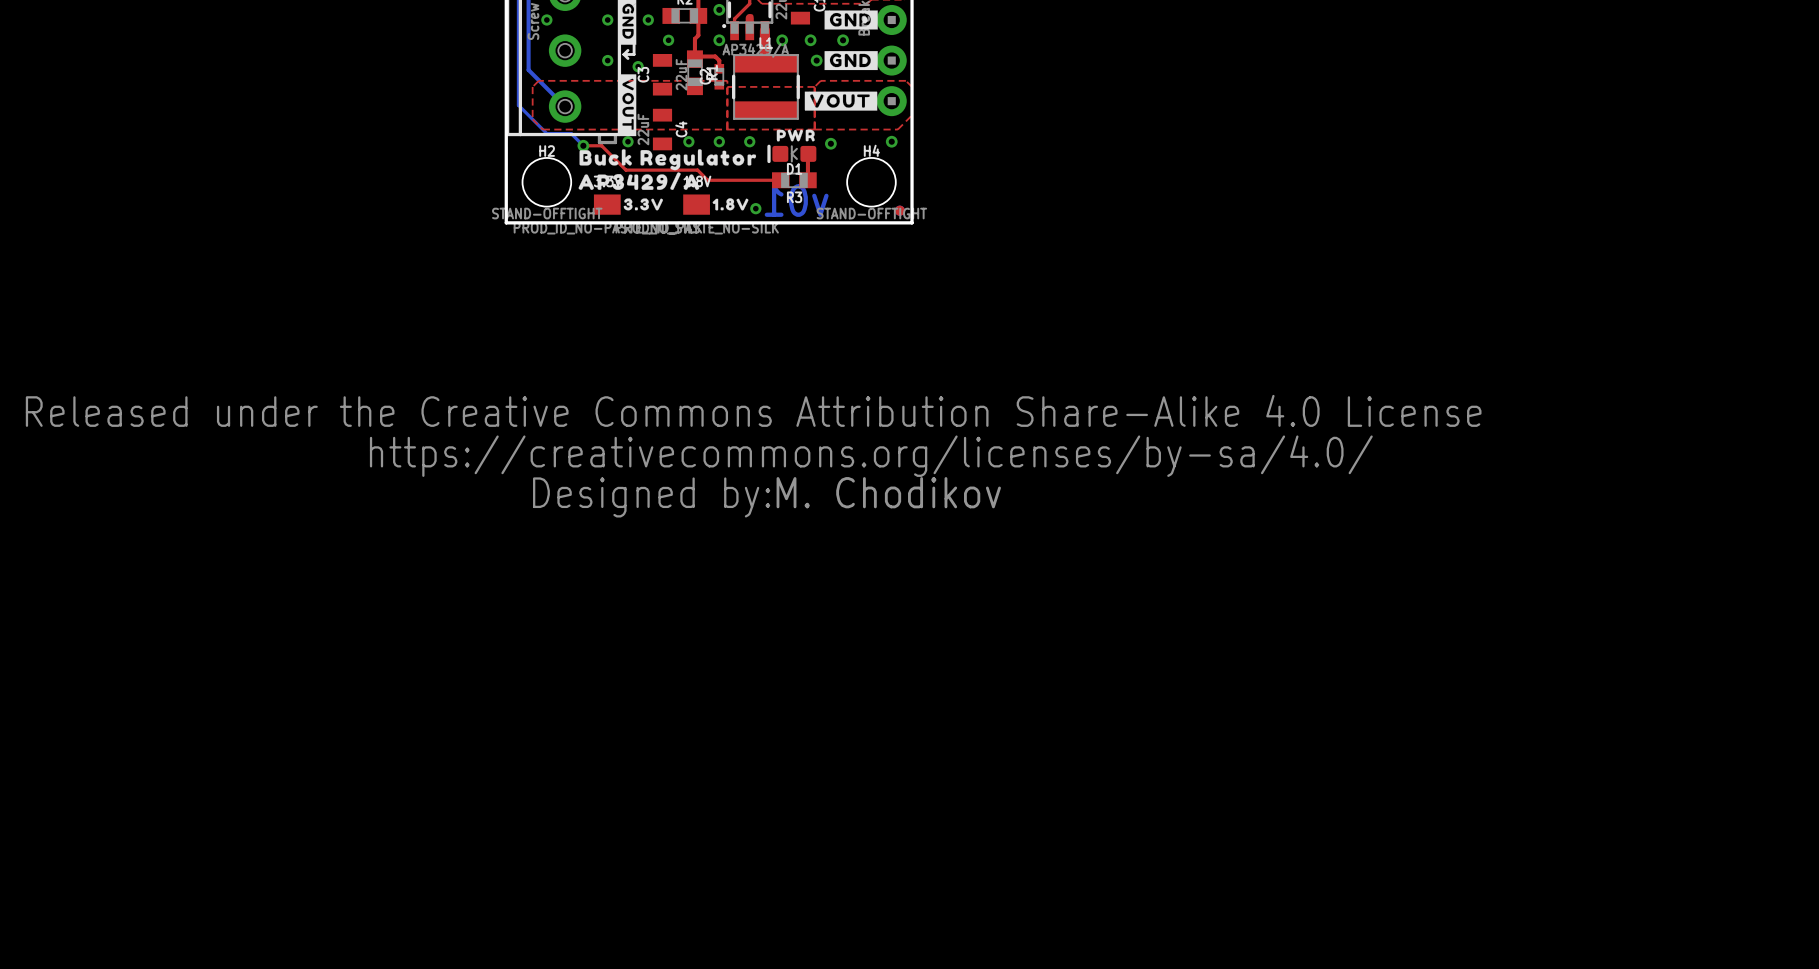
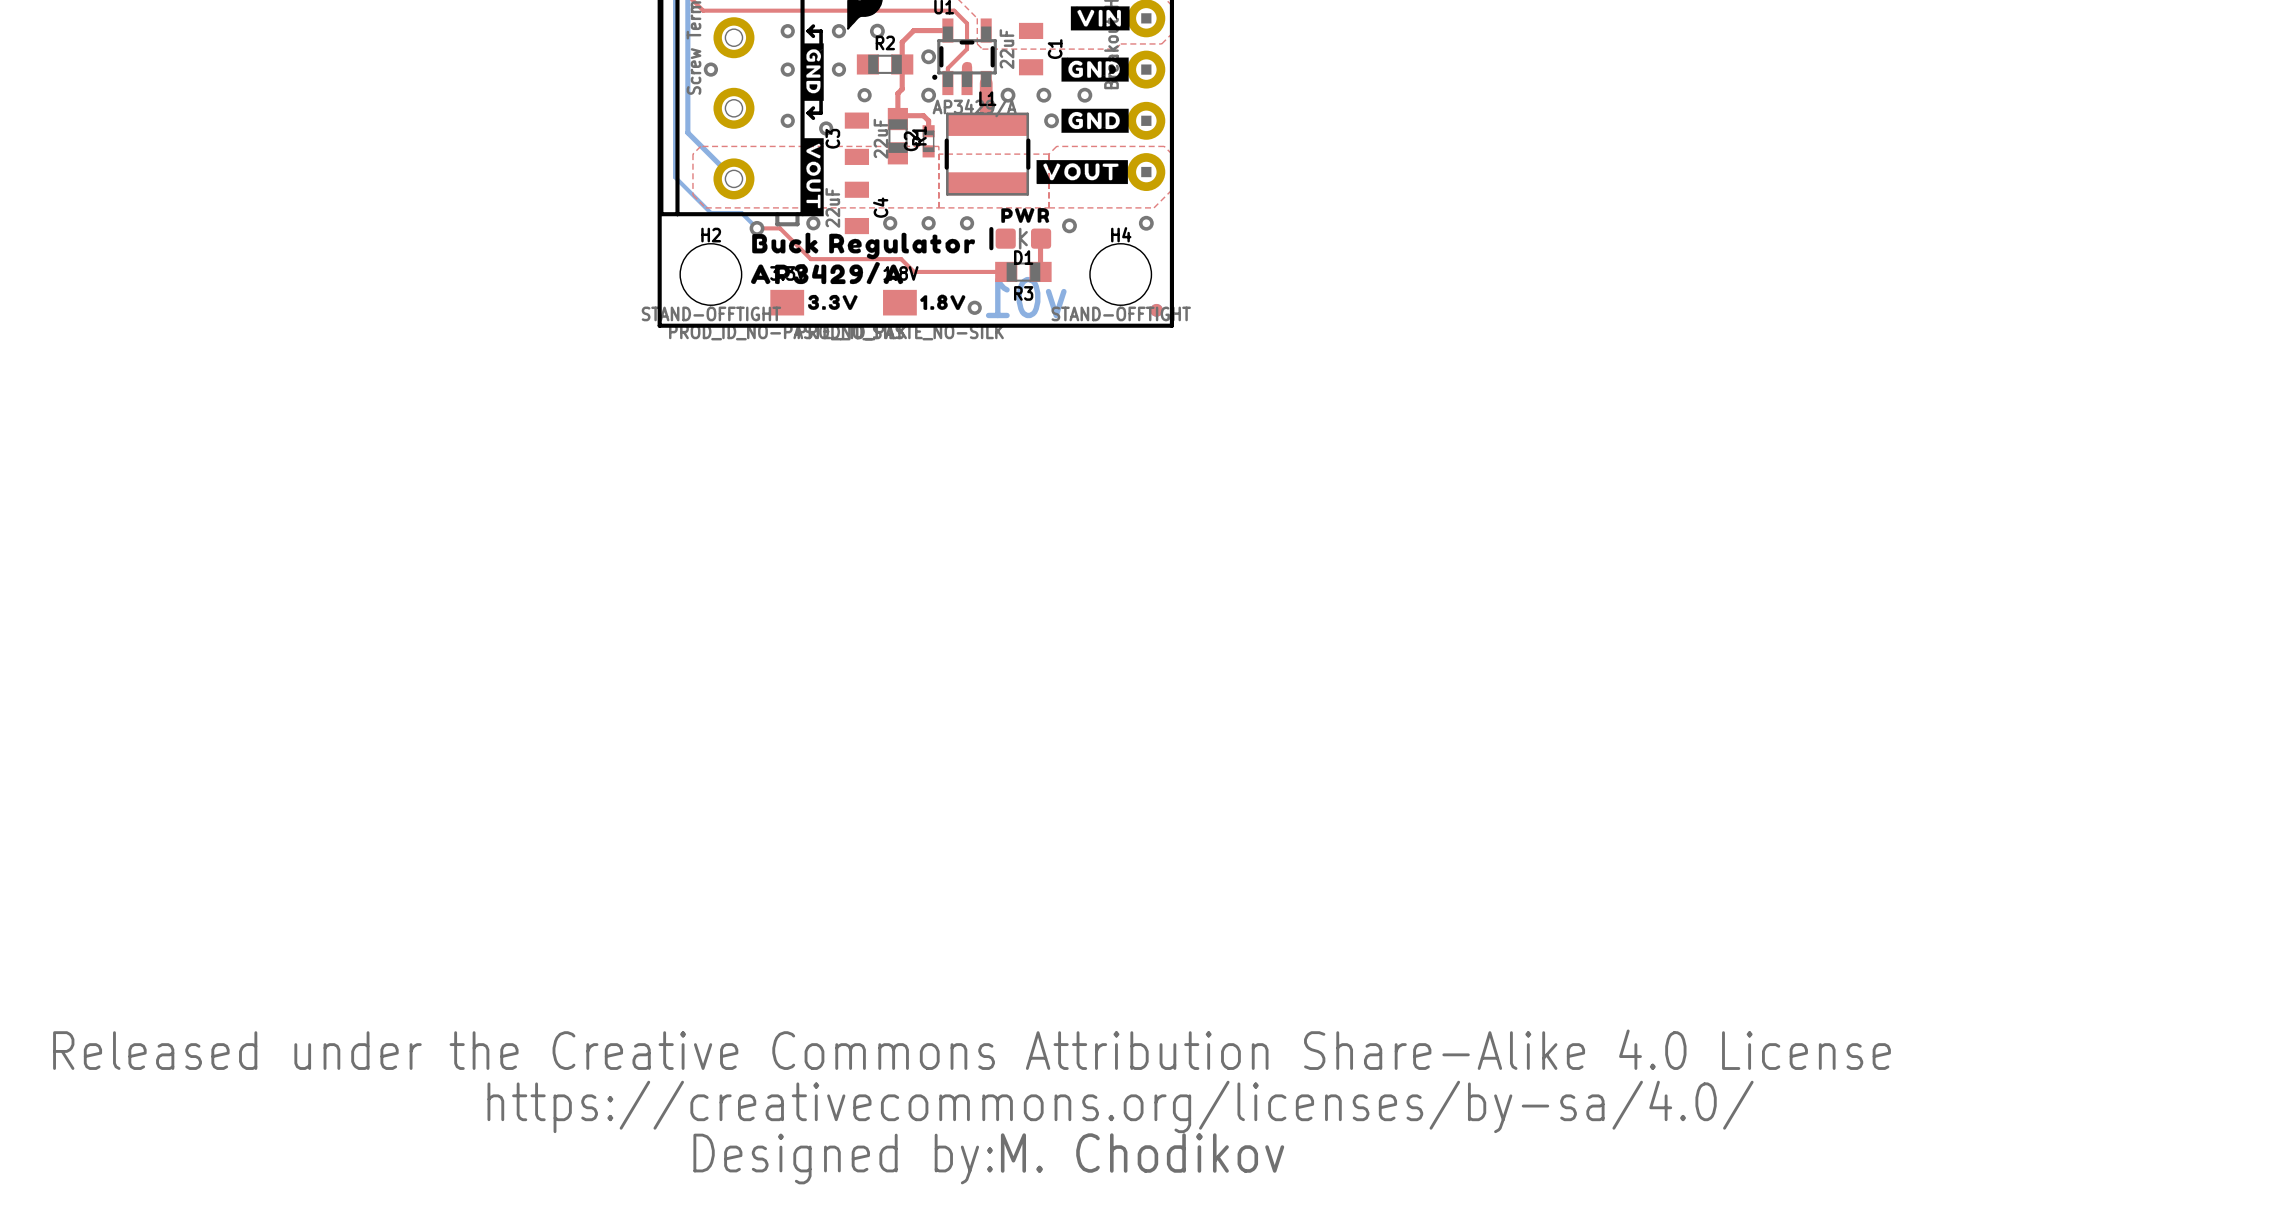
drawing position: (753, 456) -> (972, 1106)
text position: M. Chodikov (888, 492) -> M. Chodikov (1142, 1153)

